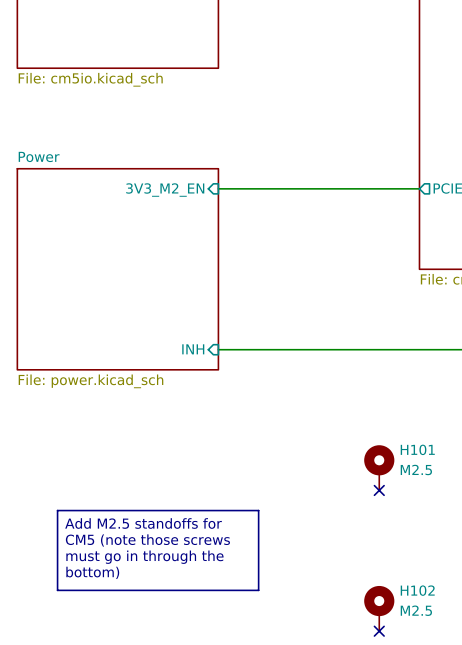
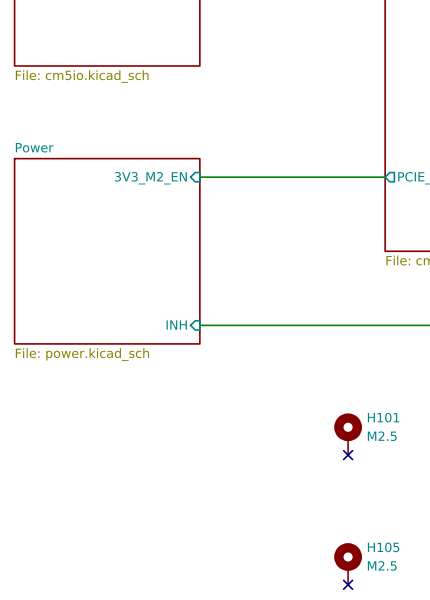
line: (57, 510) (258, 510) (258, 590) (57, 590) (57, 510) -> none
text: Add M2.5 standoffs for (143, 523) -> none
text: CM5 (note those screws (147, 540) -> none
text: must go in through the (144, 557) -> none
text: bottom) (92, 572) -> none
H102 name: H102 (417, 590) -> H105 (383, 547)

